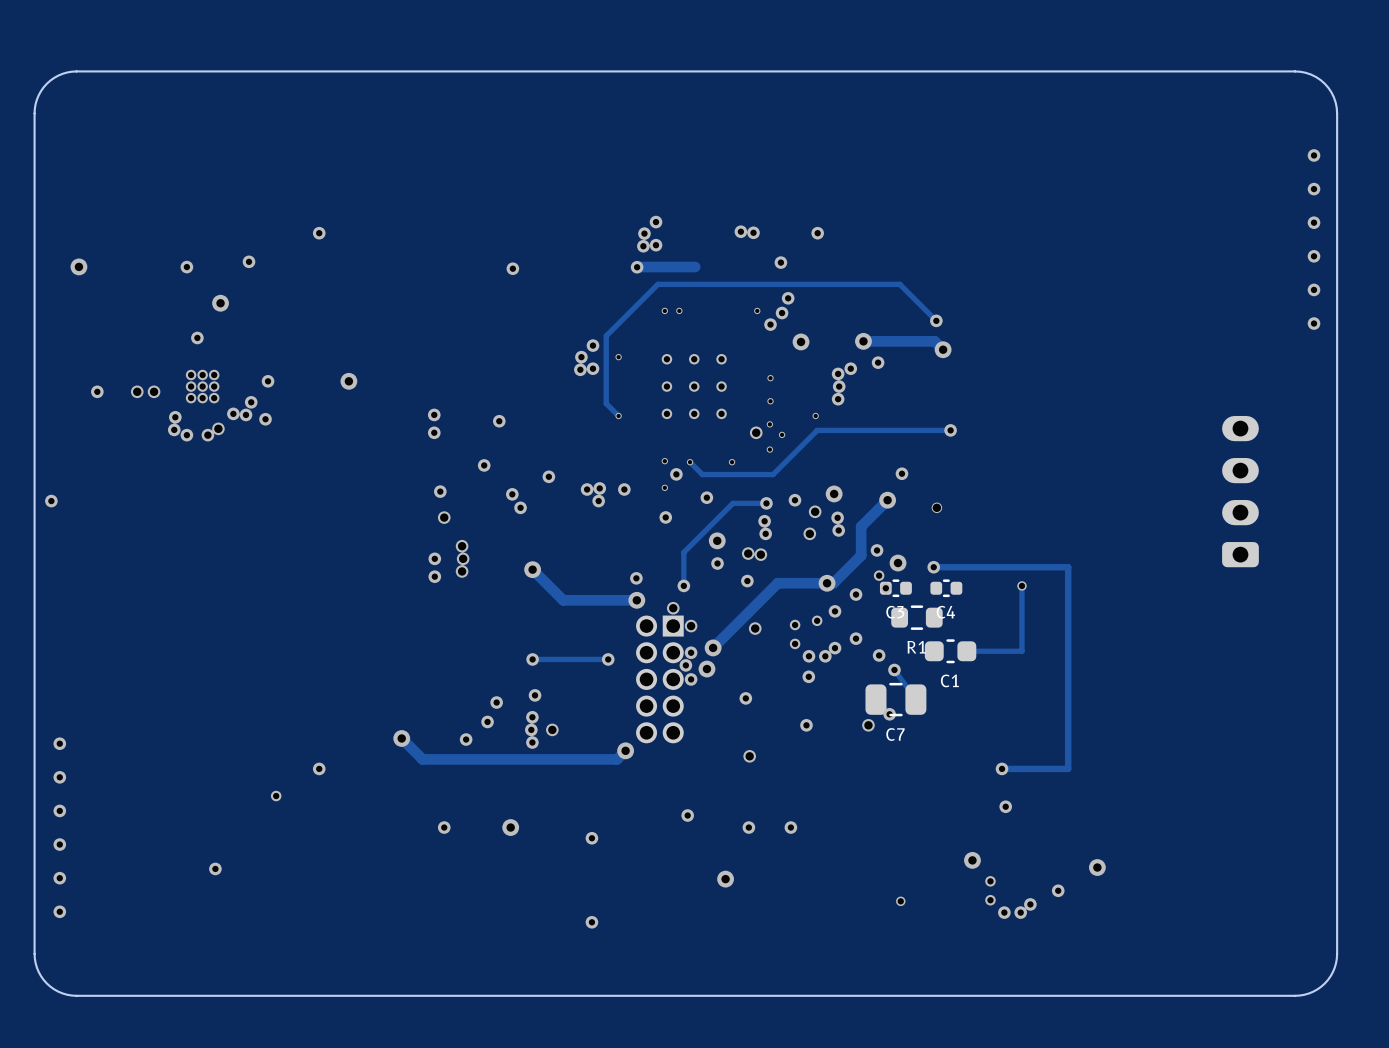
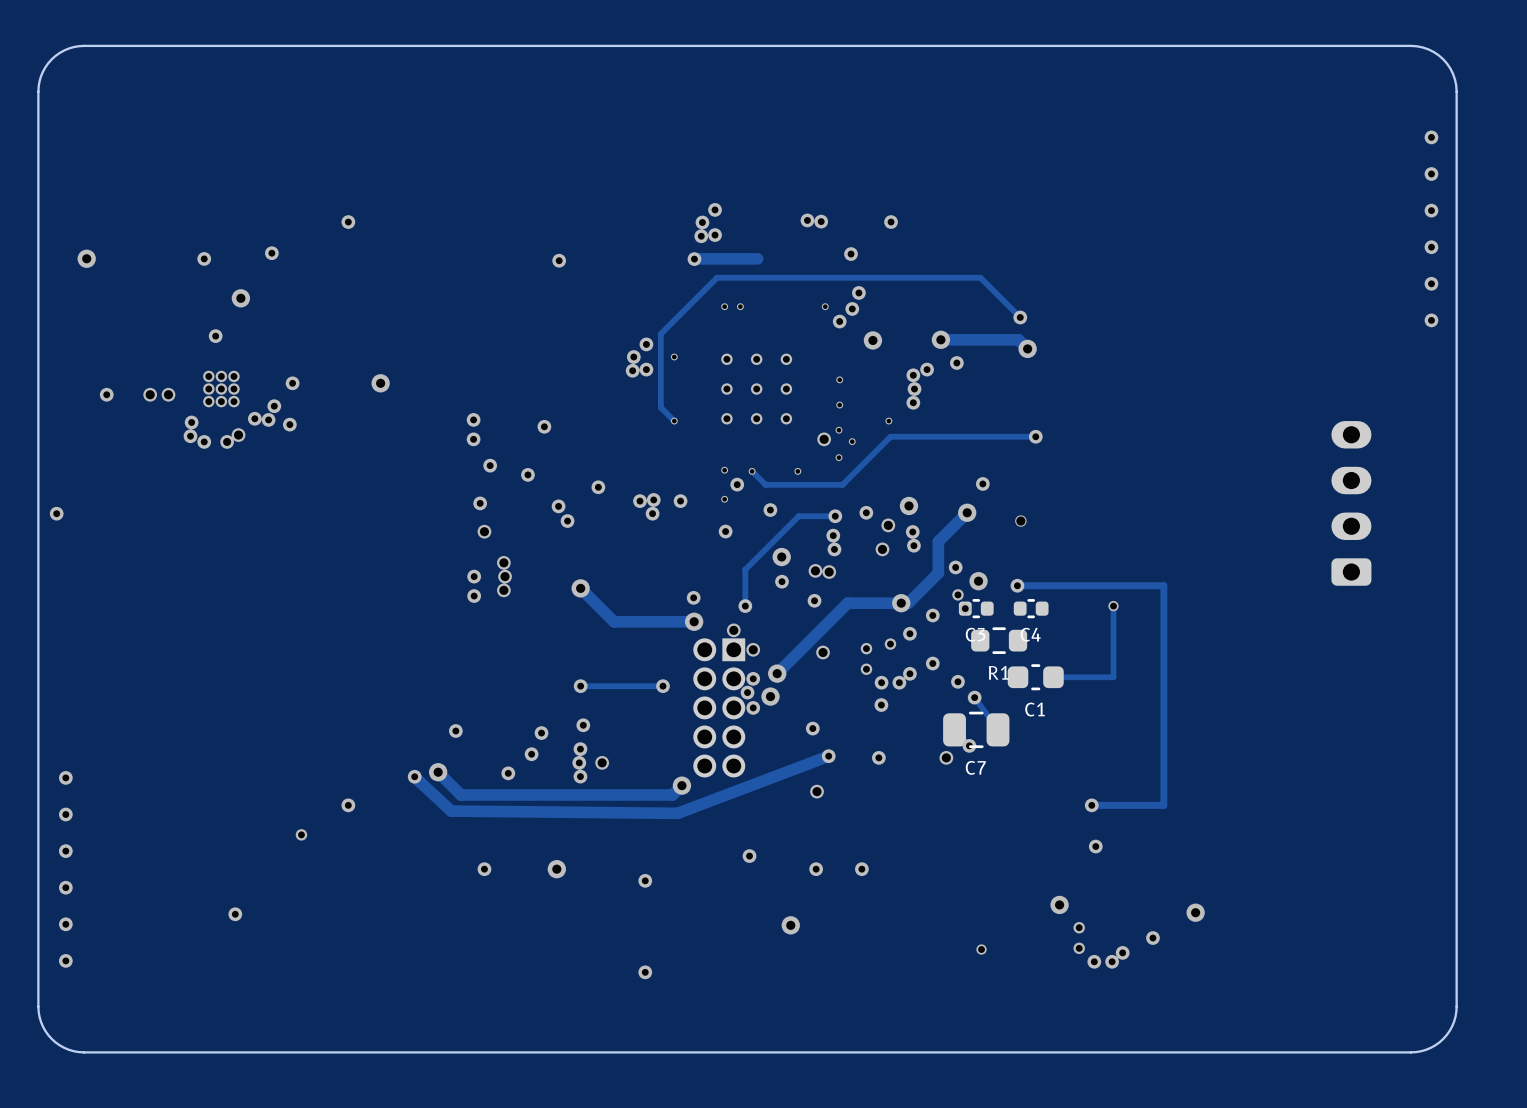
via: none -> (490, 465)
via: none -> (455, 731)
track: none -> (828, 756) (677, 813) (451, 811) (414, 776)
via: none -> (828, 756)
via: none -> (414, 776)

